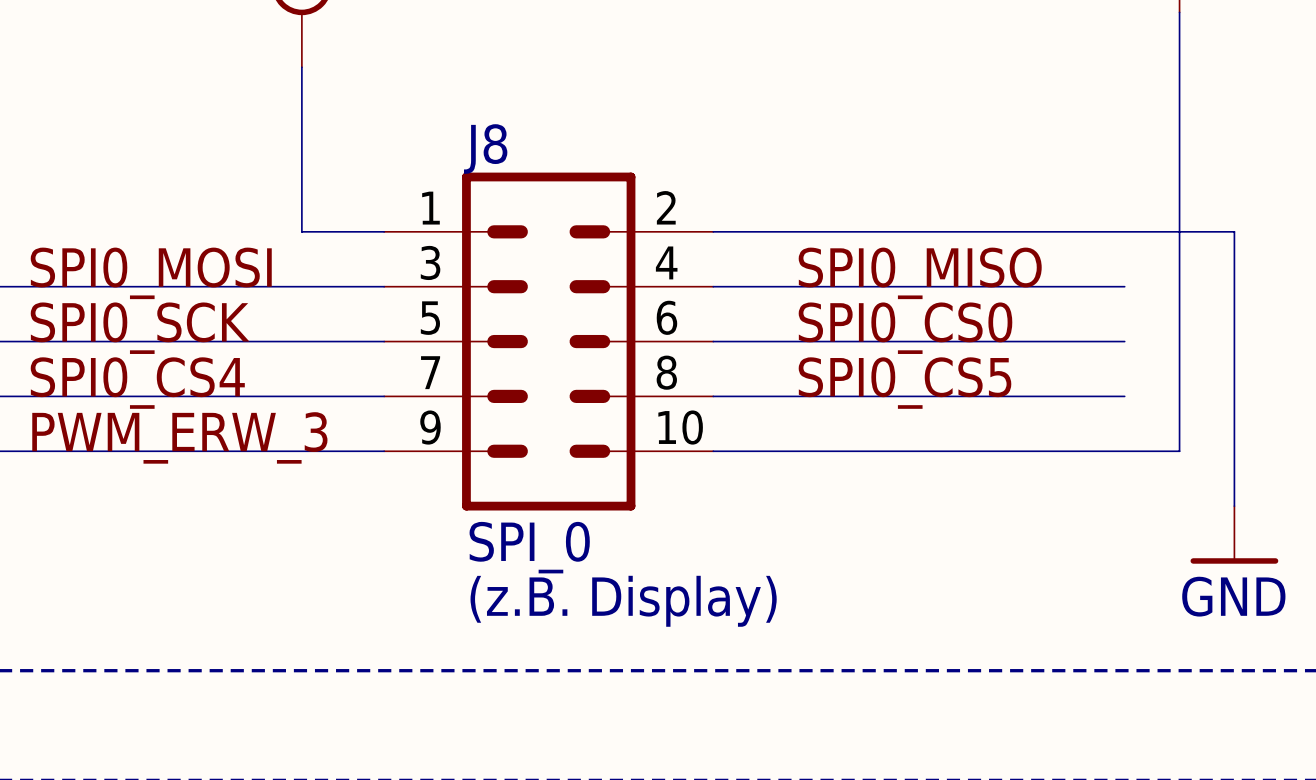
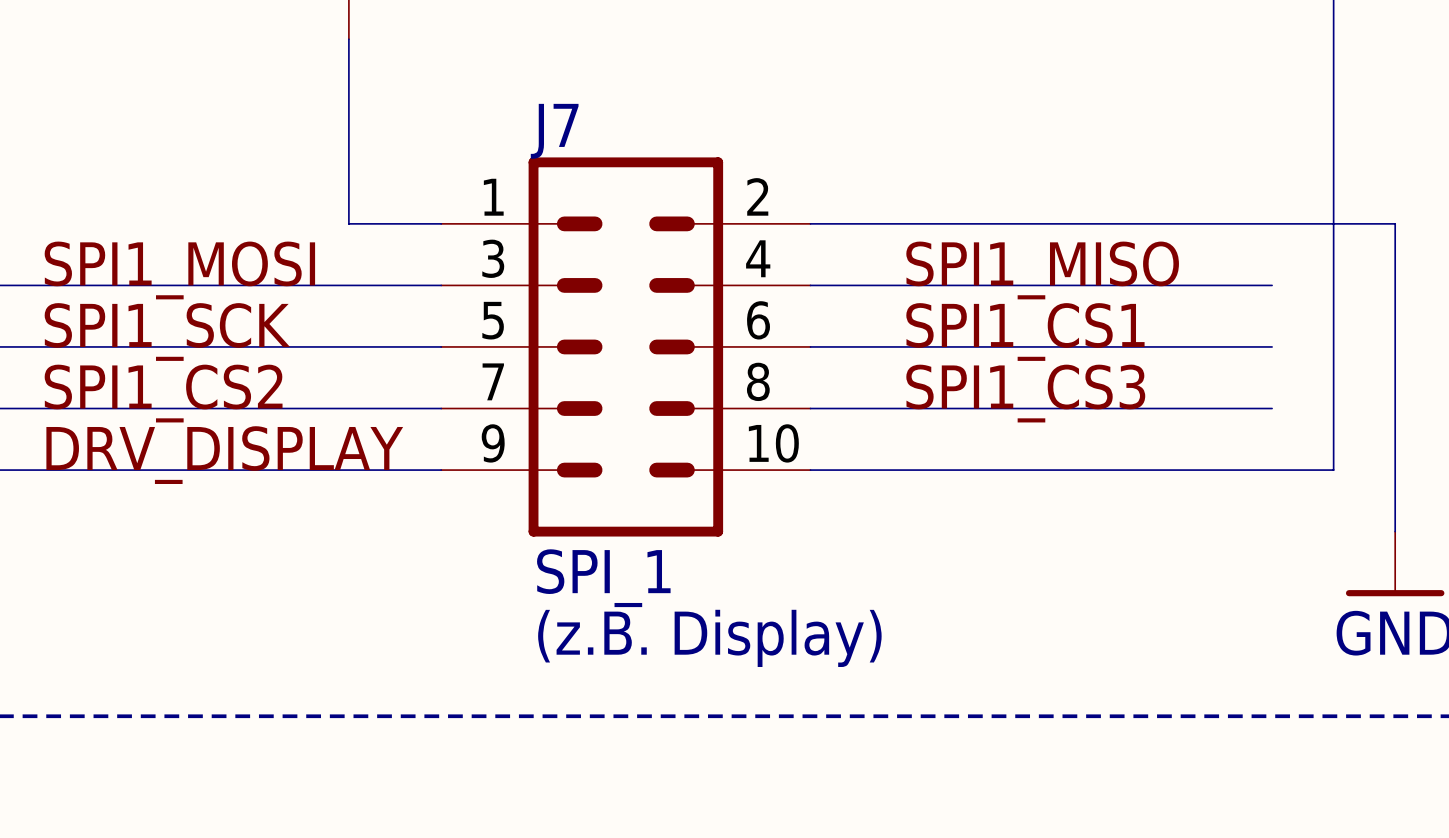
J8 name: J8 (485, 149) -> J7 (554, 131)
label: SPI0_MOSI (151, 273) -> SPI1_MOSI (179, 270)
label: SPI0_MISO (920, 273) -> SPI1_MISO (1042, 270)
label: SPI0_SCK (140, 328) -> SPI1_SCK (167, 332)
label: SPI0_CS0 (905, 328) -> SPI1_CS1 (1025, 332)
label: SPI0_CS4 (137, 383) -> SPI1_CS2 (163, 393)
label: SPI0_CS5 (904, 383) -> SPI1_CS3 (1025, 393)
label: PWM_ERW_3 (179, 437) -> DRV_DISPLAY (224, 455)
J8 value: SPI_0 (529, 547) -> SPI_1 (603, 578)

